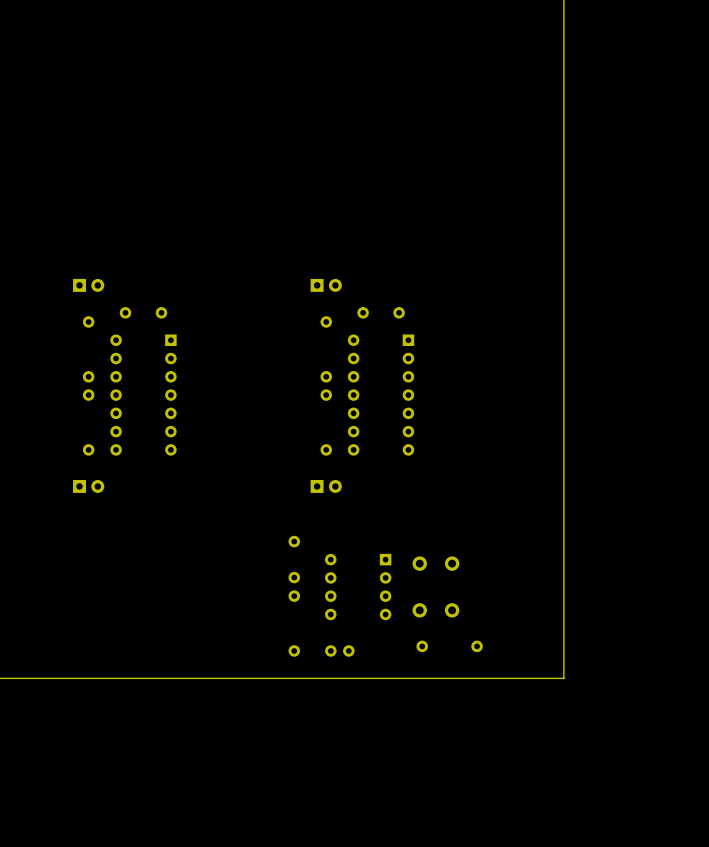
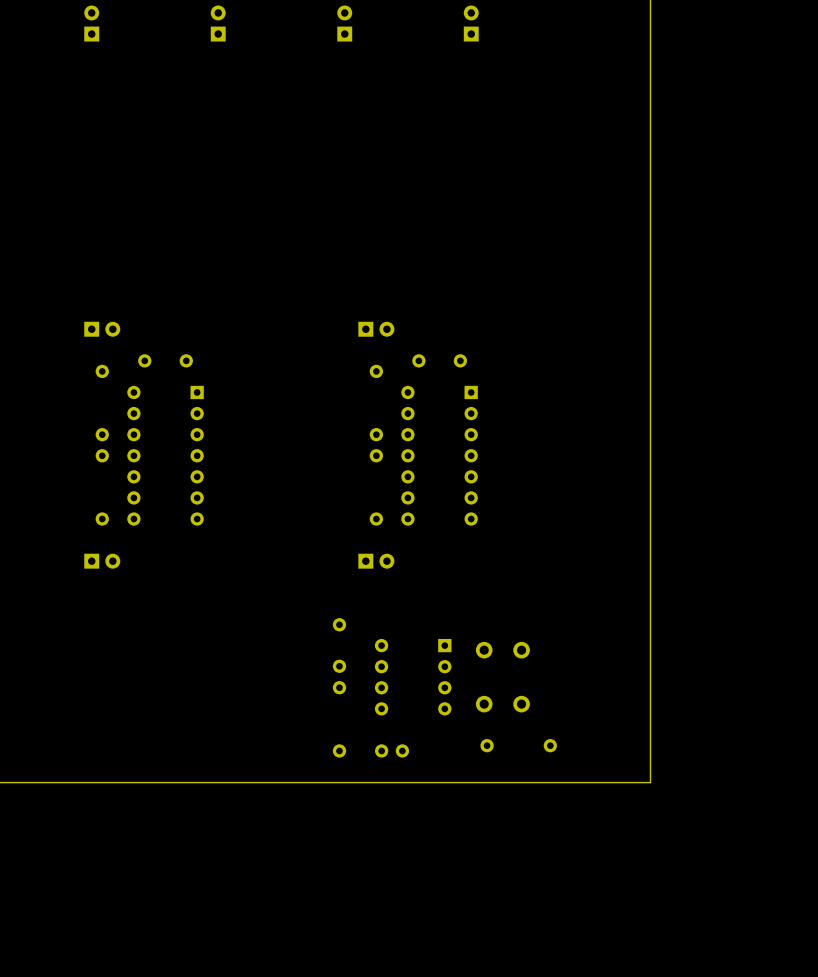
part: none -> (91, 23)
part: none -> (218, 23)
part: none -> (344, 23)
part: none -> (471, 23)

